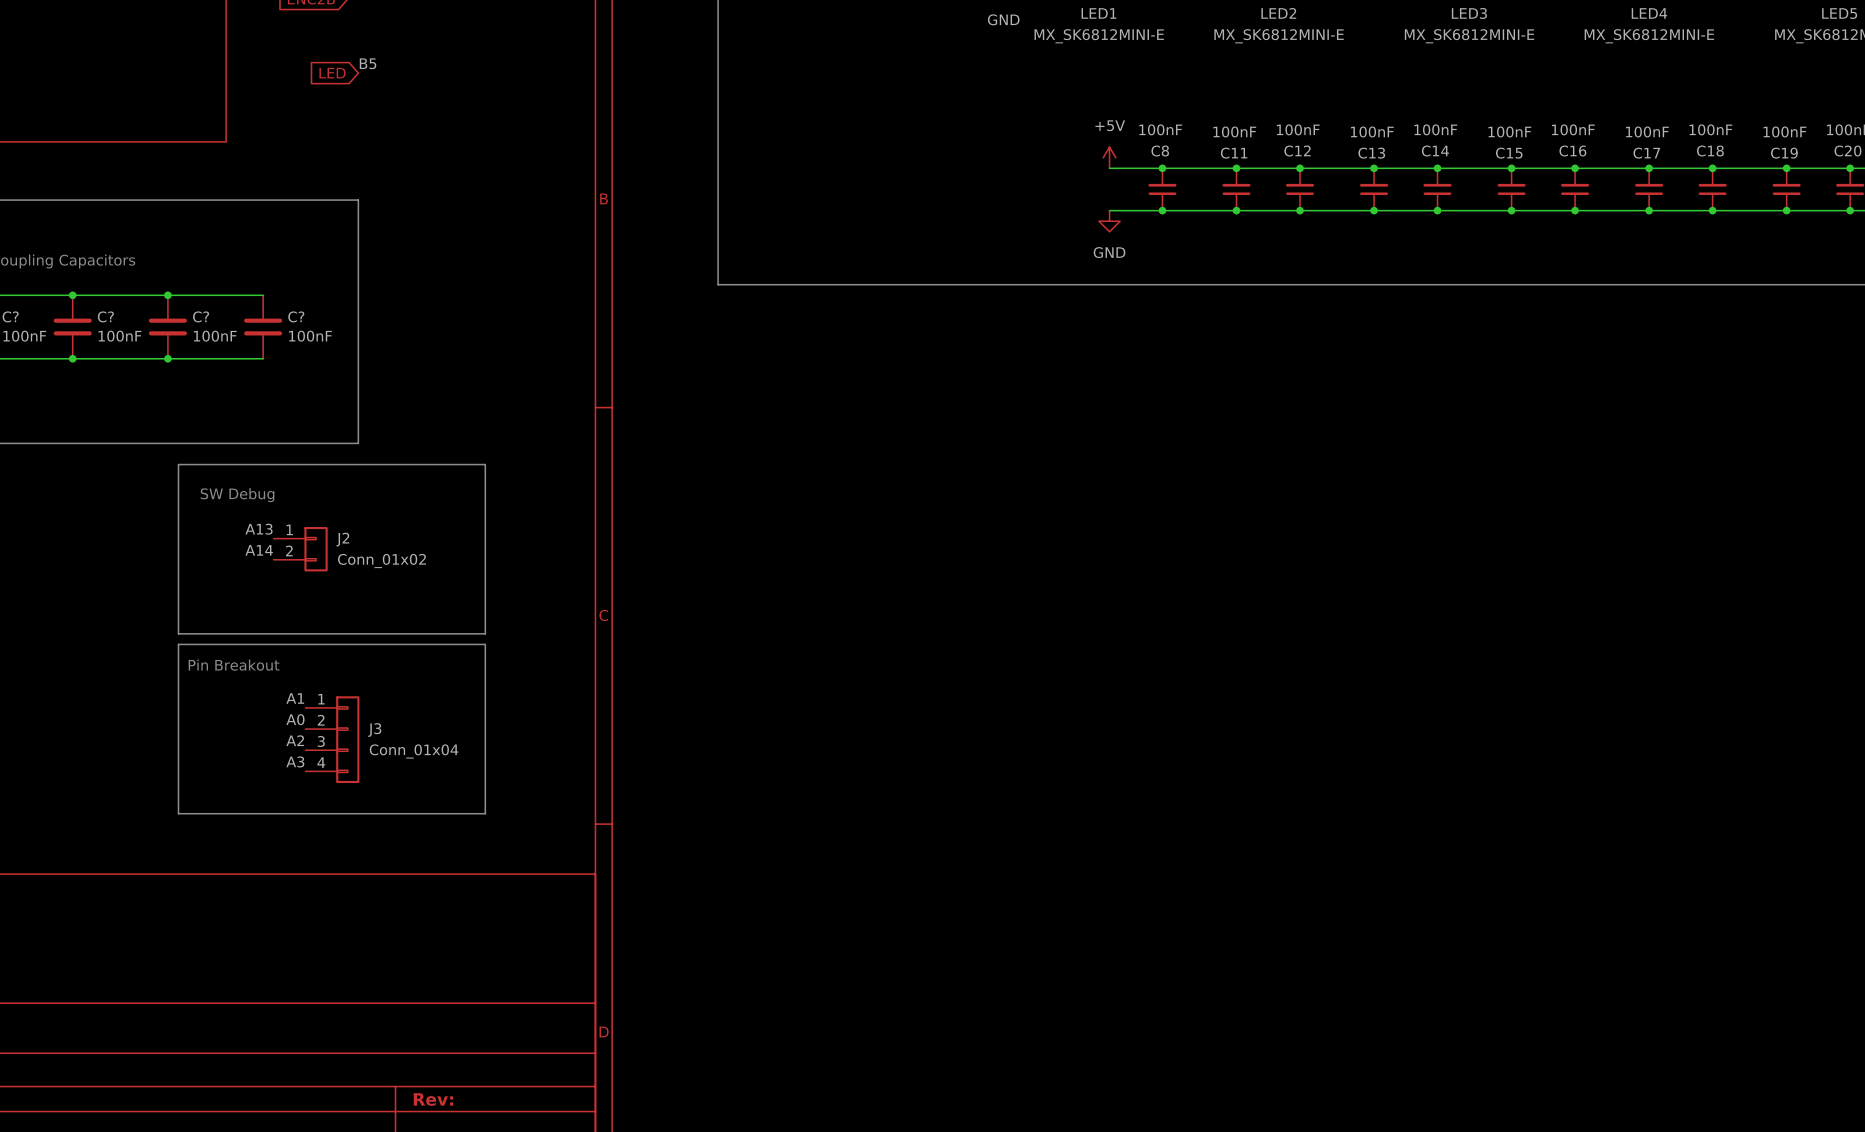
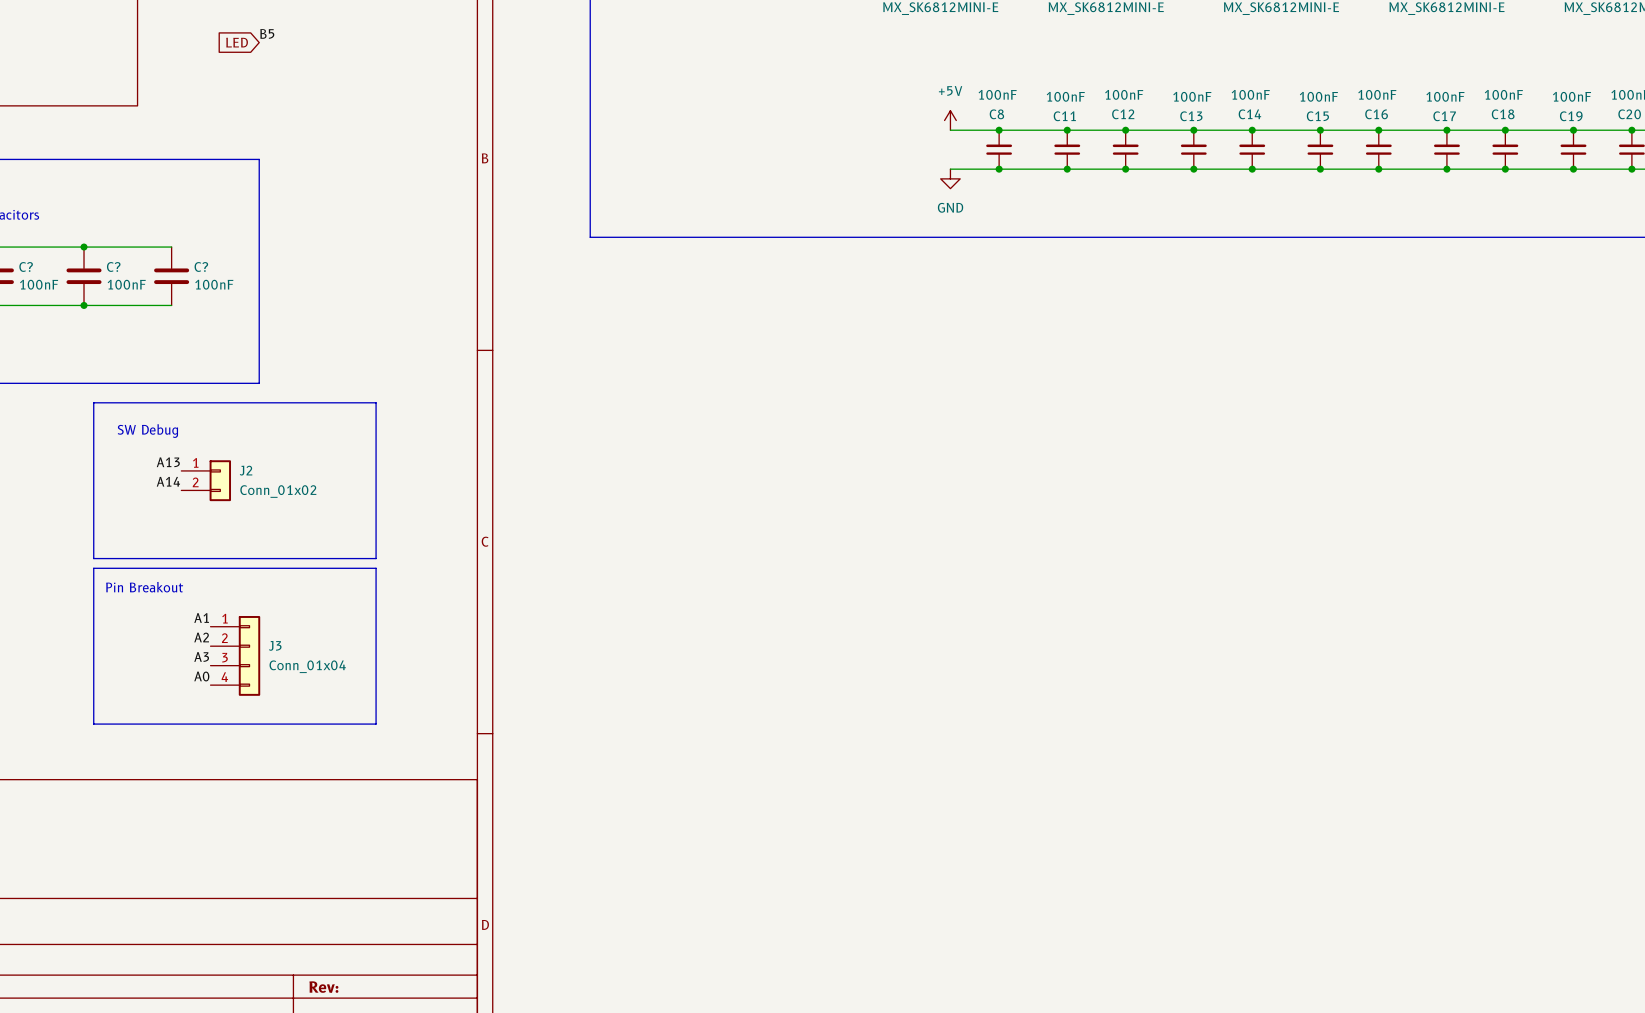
label: A0 (295, 719) -> A2 (201, 637)
label: A2 (295, 740) -> A3 (201, 656)
label: A3 (295, 761) -> A0 (201, 676)

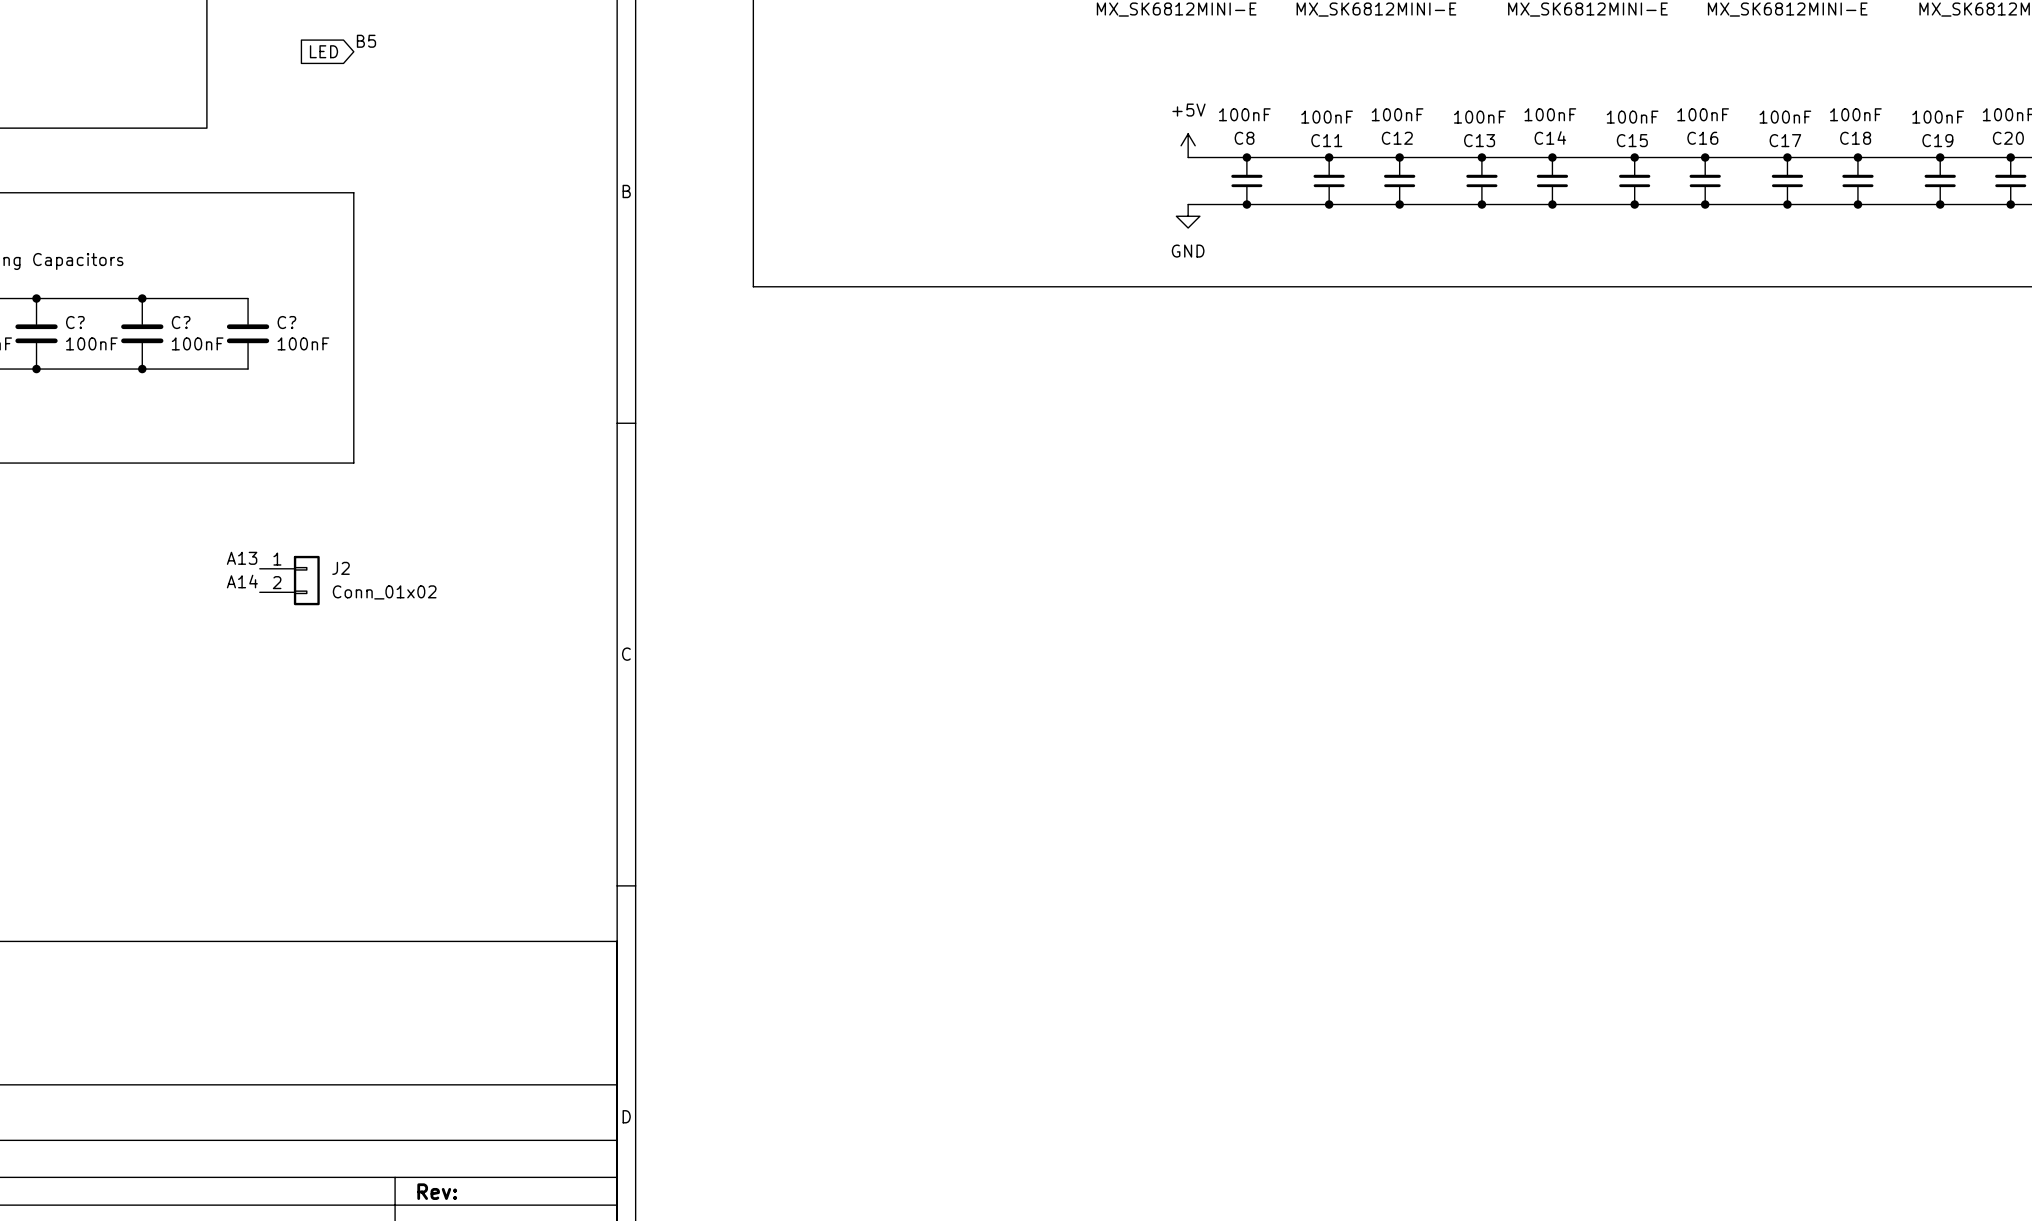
line: (93, 402) (93, 558) (376, 558) (376, 402) (93, 402) -> none
text: SW Debug (147, 431) -> none
line: (93, 568) (376, 568) (376, 724) (93, 724) (93, 568) -> none
text: Pin Breakout (144, 587) -> none
label: A1 (201, 618) -> none
label: A2 (201, 637) -> none
J3: Conn_01x04 (235, 655) -> none
label: A3 (201, 656) -> none
label: A0 (201, 676) -> none

